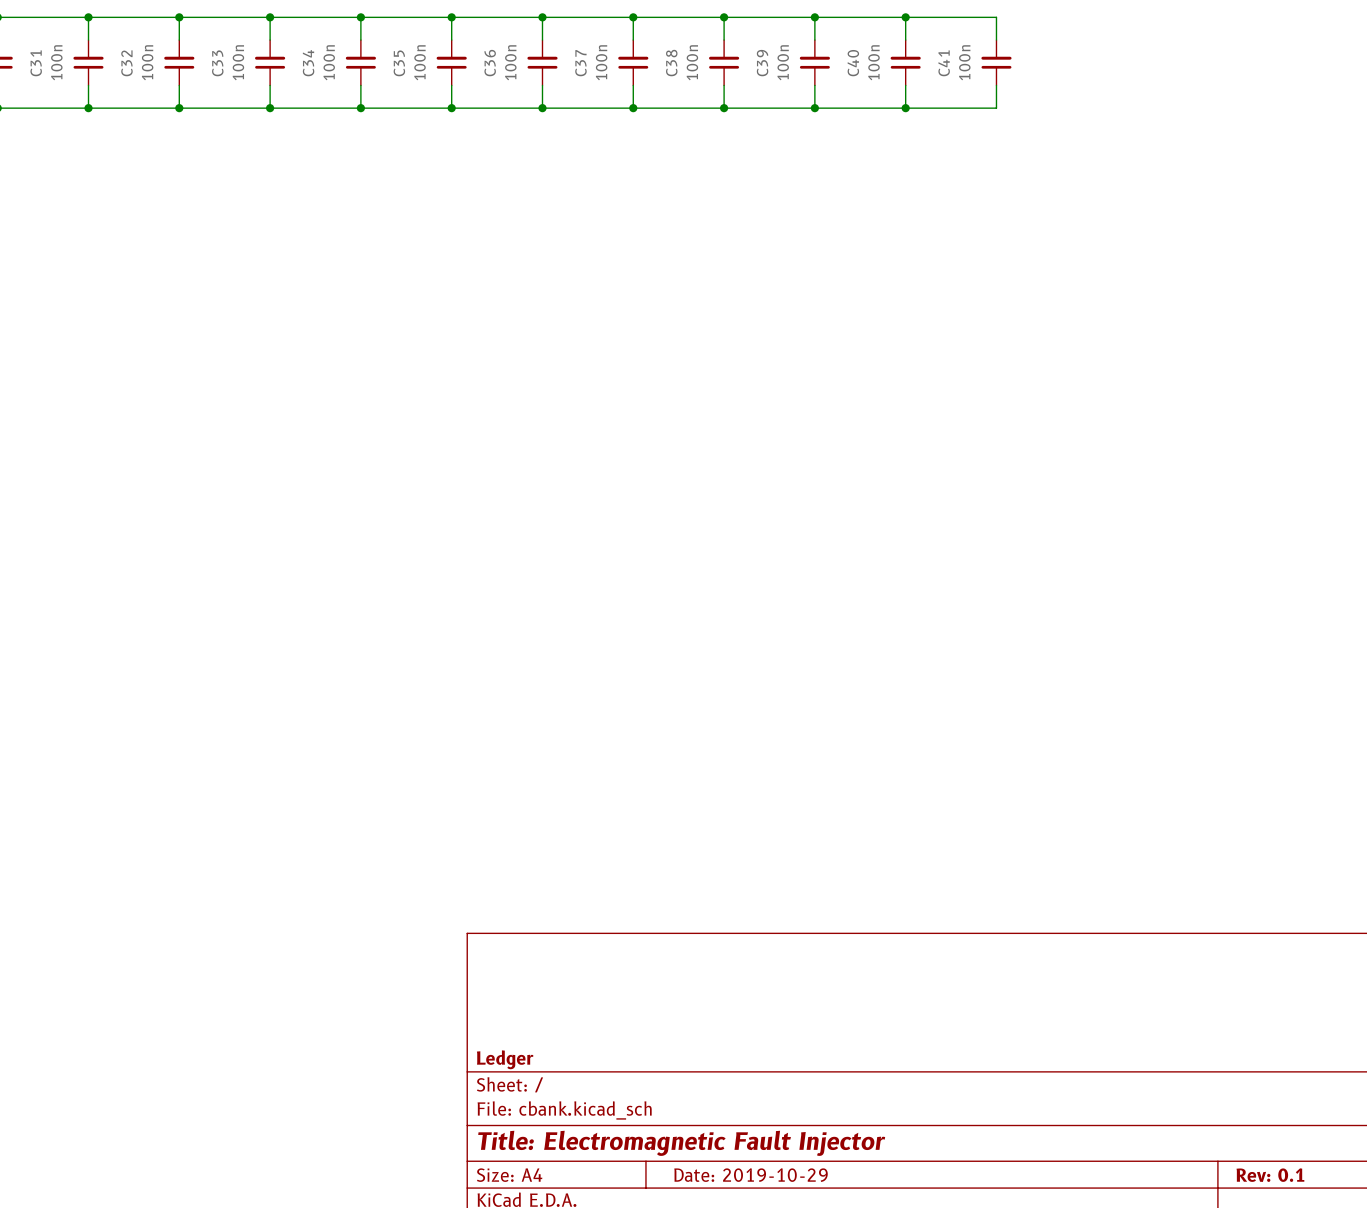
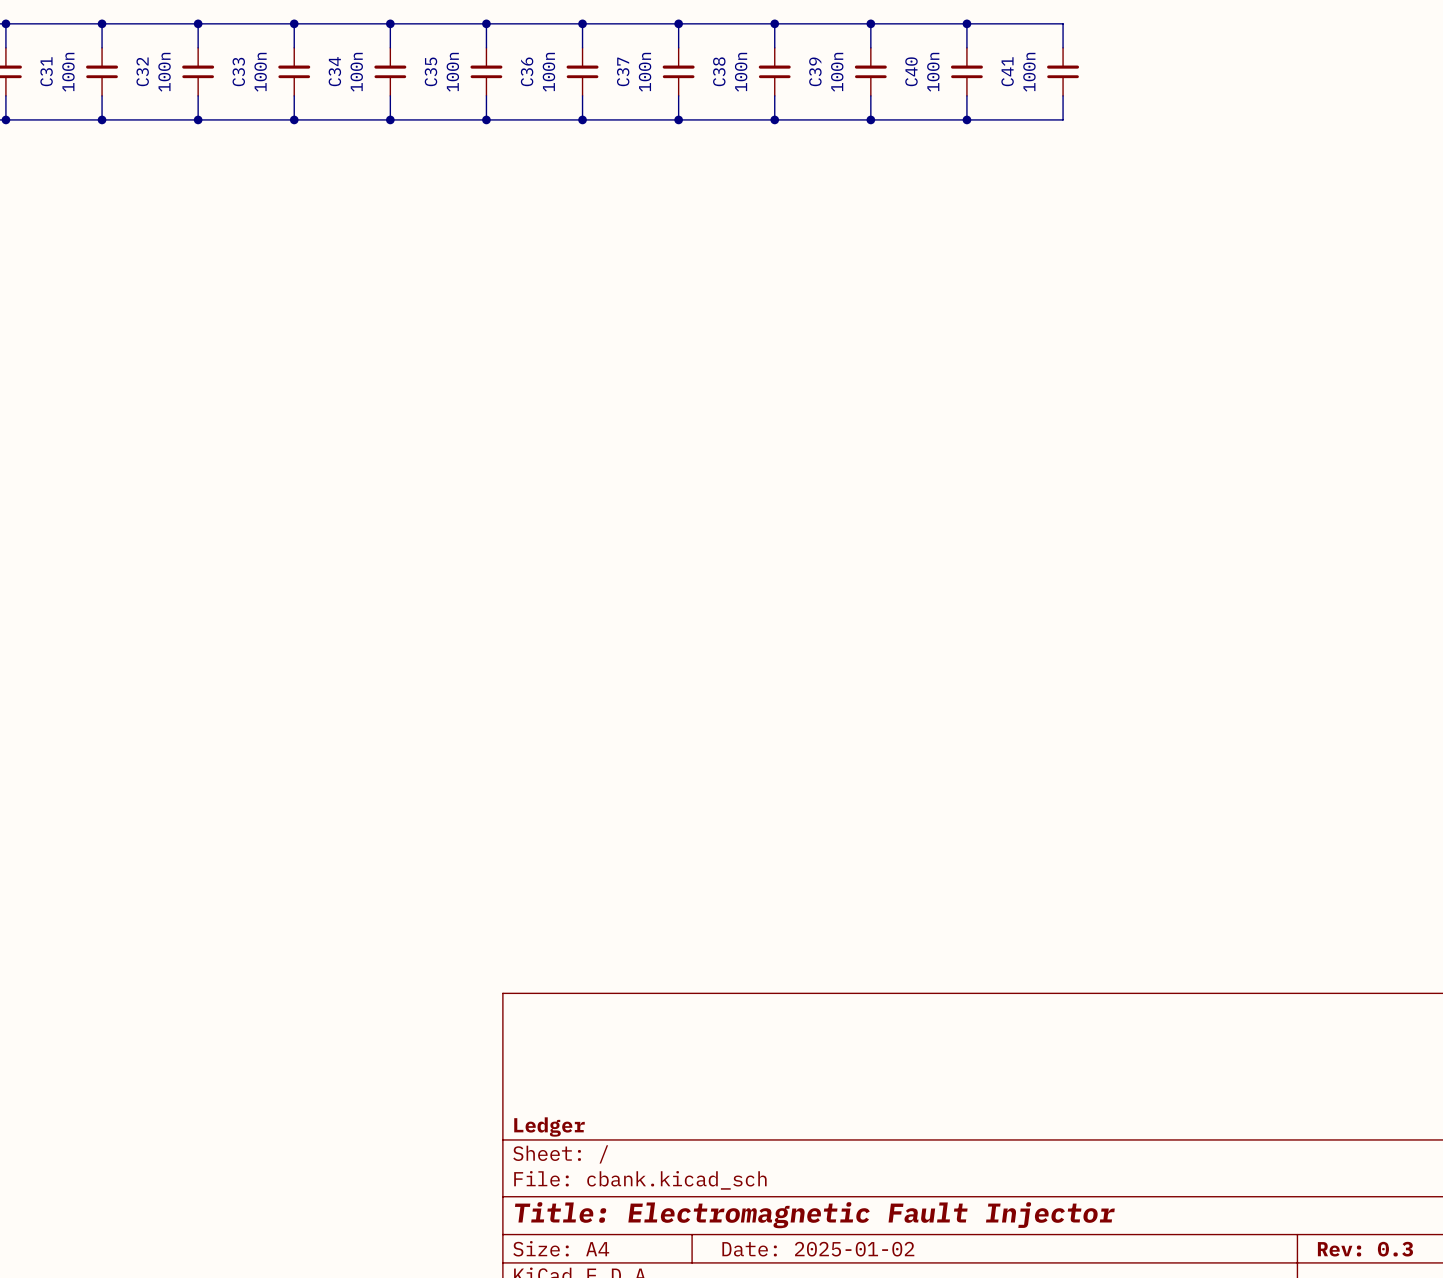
title block: Date: 2019-10-29 (751, 1175) -> Date: 2025-01-02 (818, 1249)
title block: Rev: 0.1 (1270, 1175) -> Rev: 0.3 (1365, 1249)

